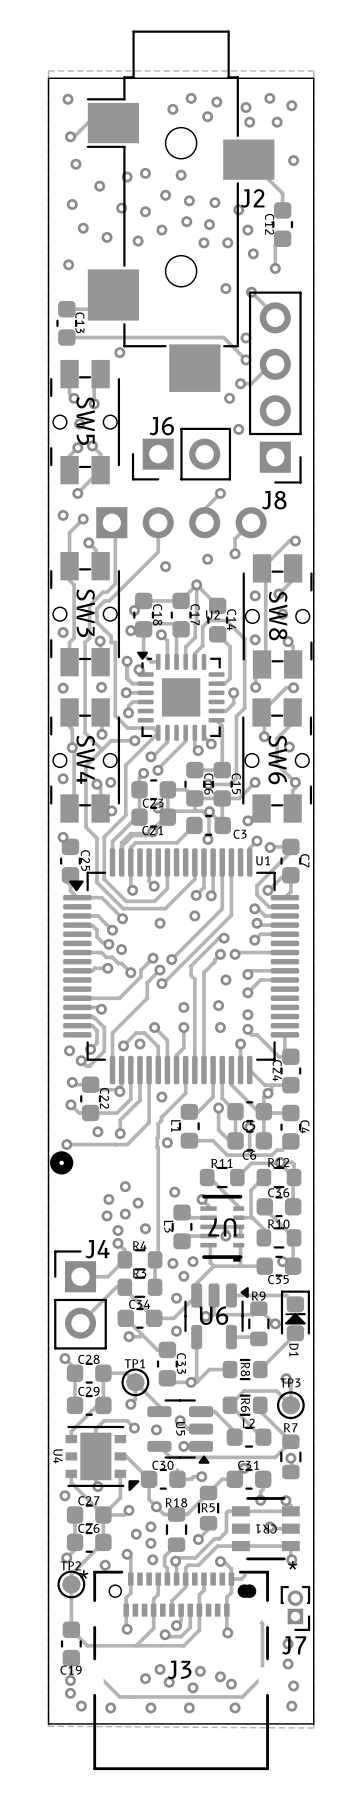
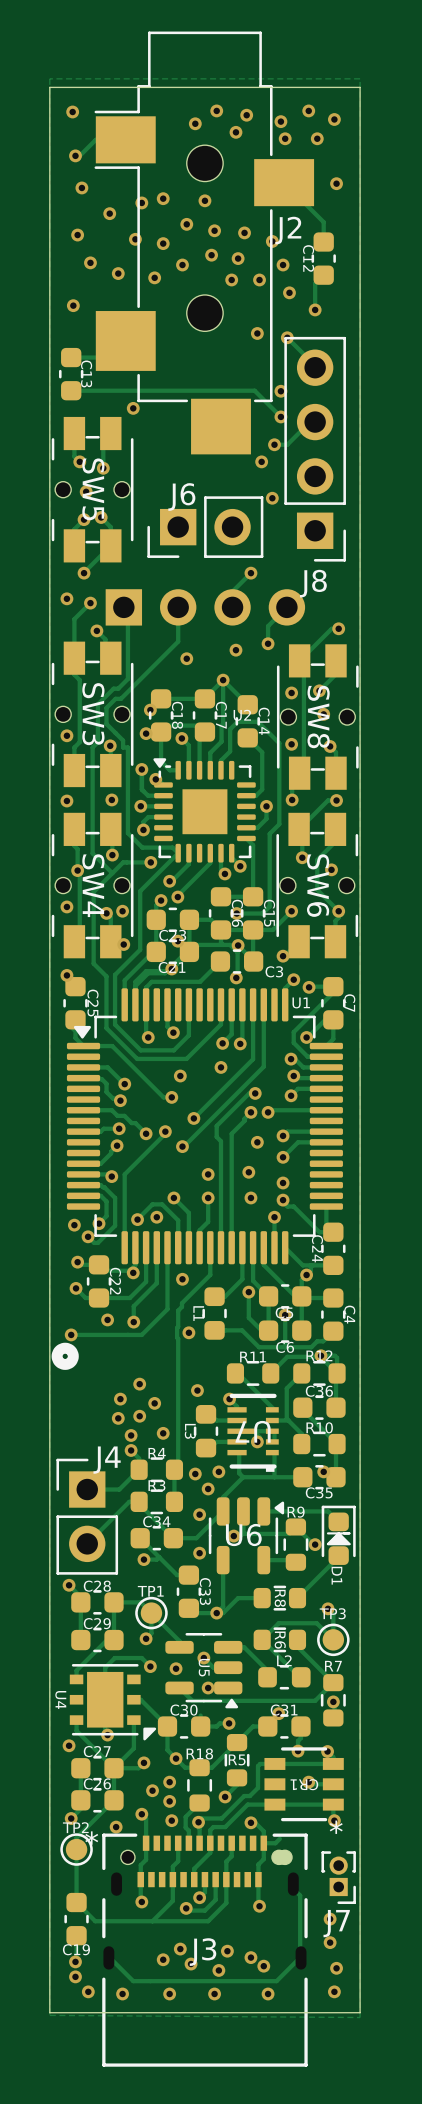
track: none -> (136, 1070) (163, 1097) (171, 1097)
via: (122, 918) -> none
via: none -> (171, 1097)
via: (121, 949) -> none
track: (153, 958) (140, 970) (140, 976) (119, 998) (92, 998) -> (117, 1145) (100, 1163)
via: (153, 958) -> none
via: none -> (165, 1131)
track: (159, 970) (147, 982) (147, 998) (112, 1033) -> (165, 1131) (124, 1174) (124, 1204)
via: (159, 970) -> none
via: none -> (117, 1145)

